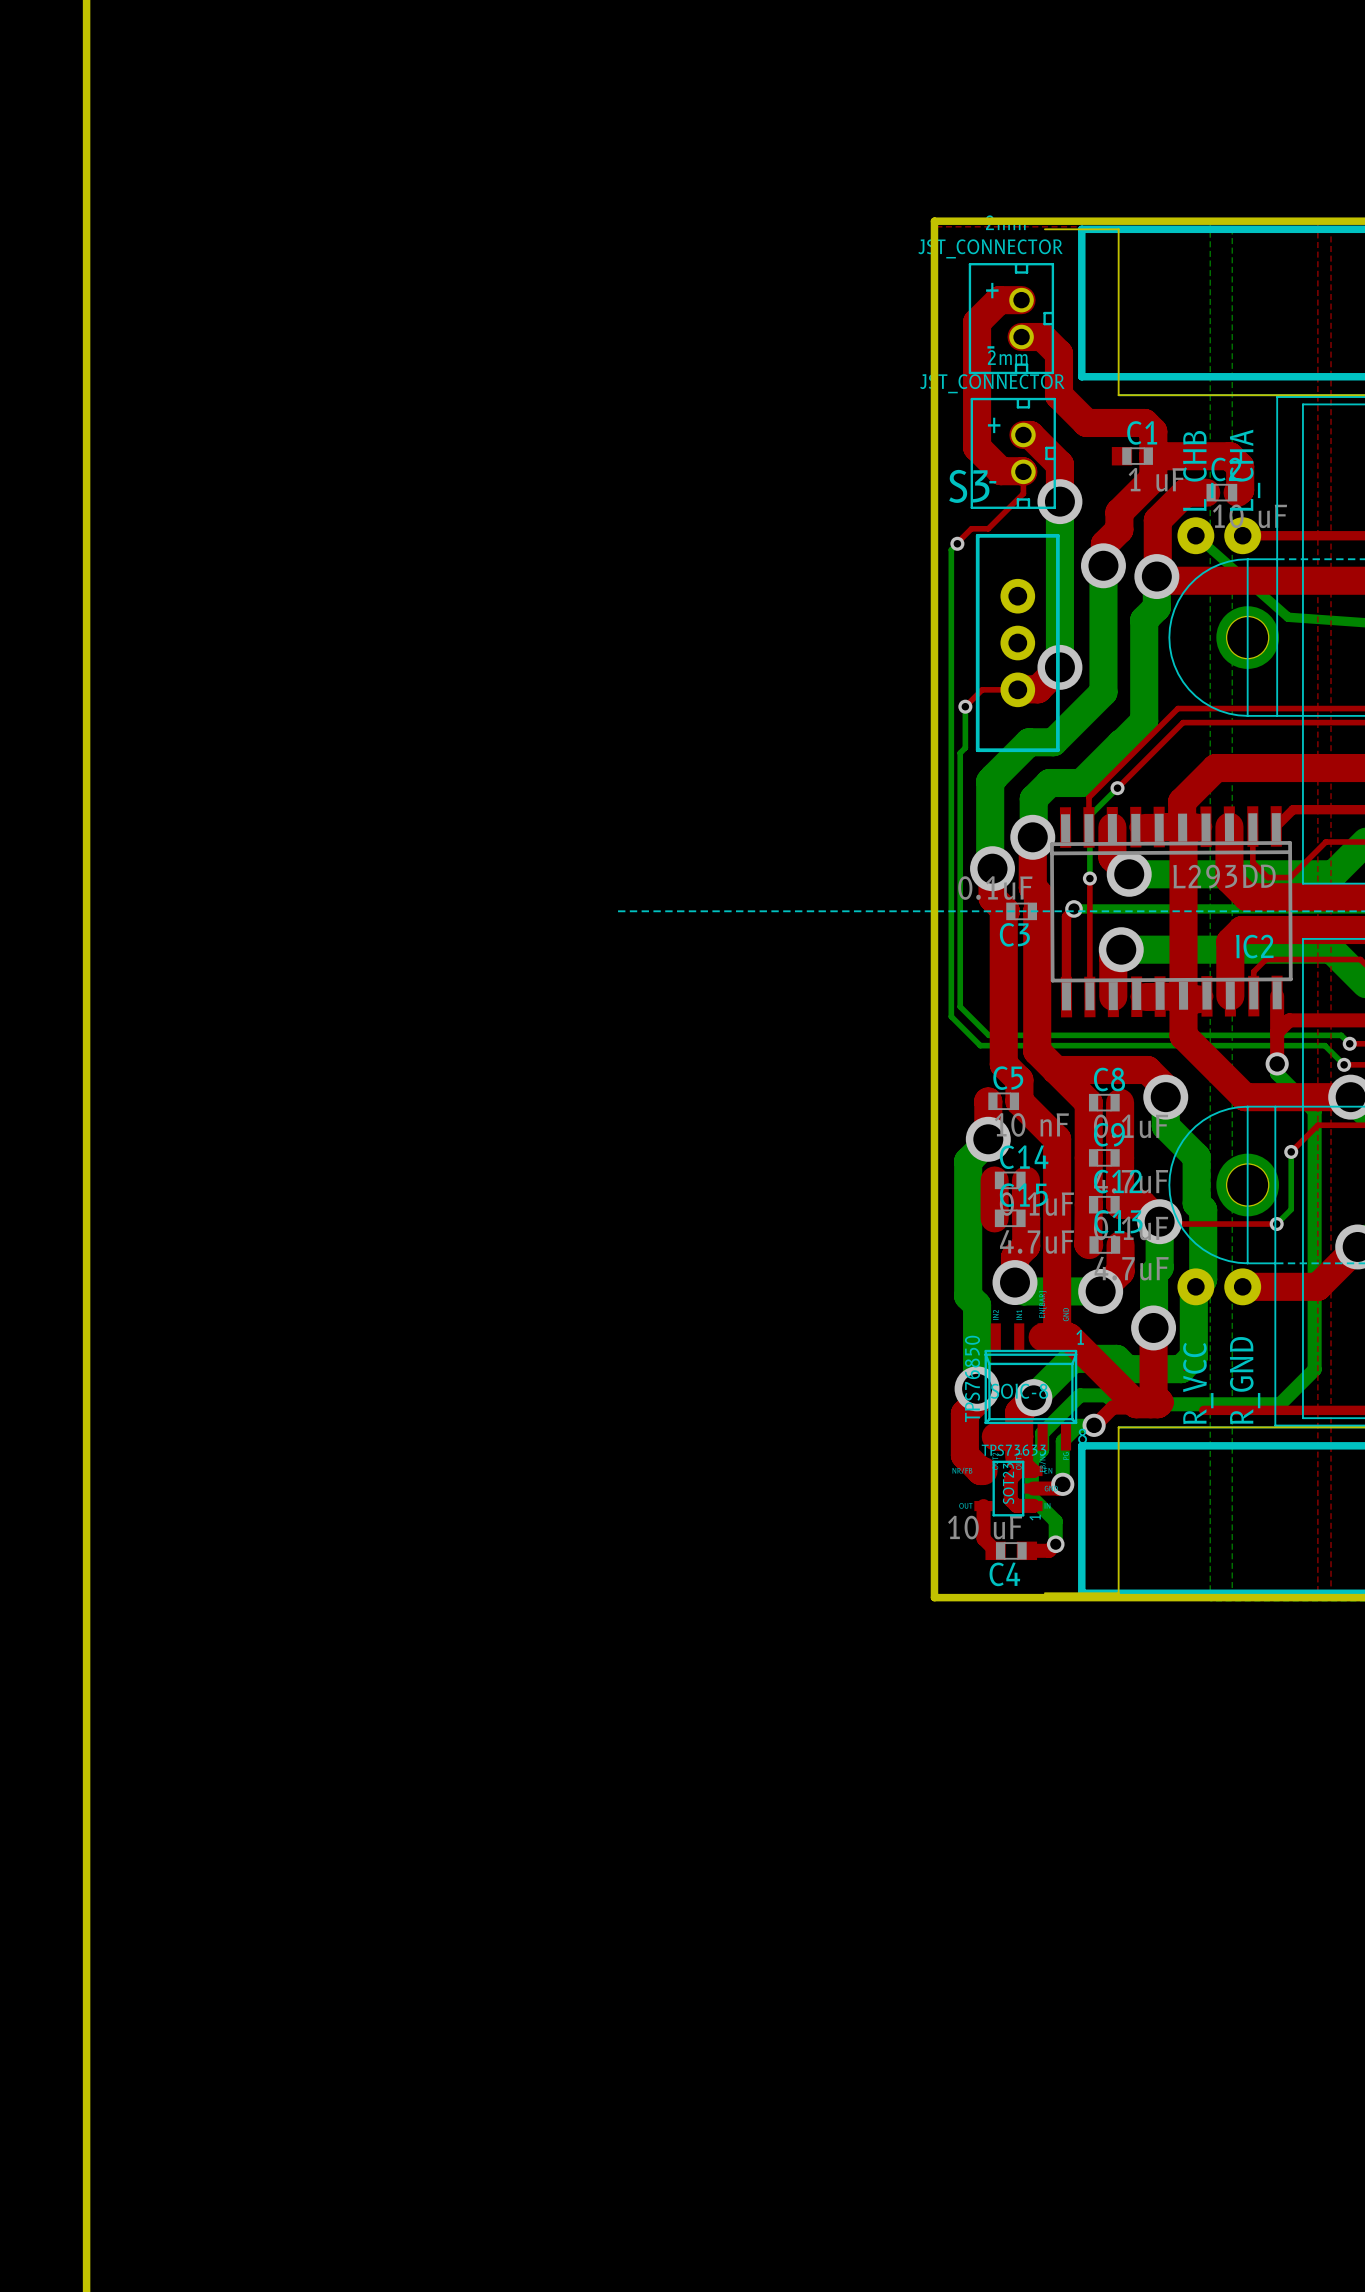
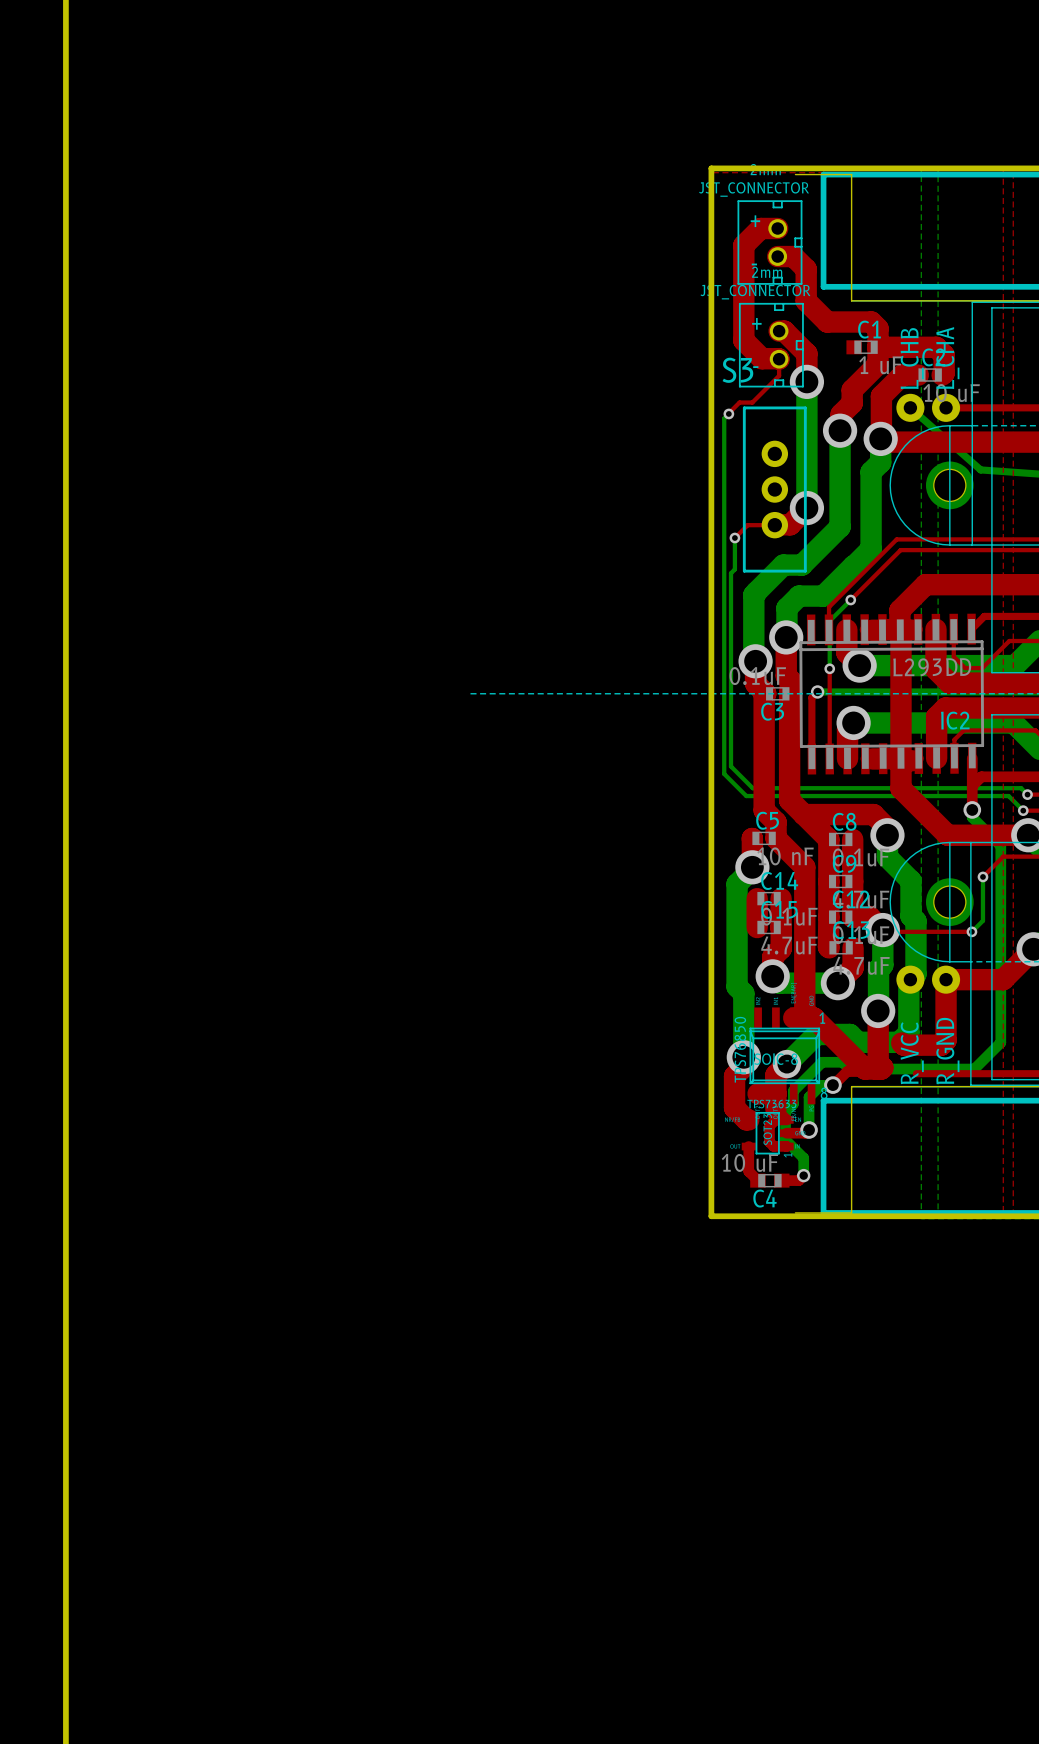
top track: none -> (946, 979) (946, 1040) (941, 1045) (903, 1045) (901, 1043)

